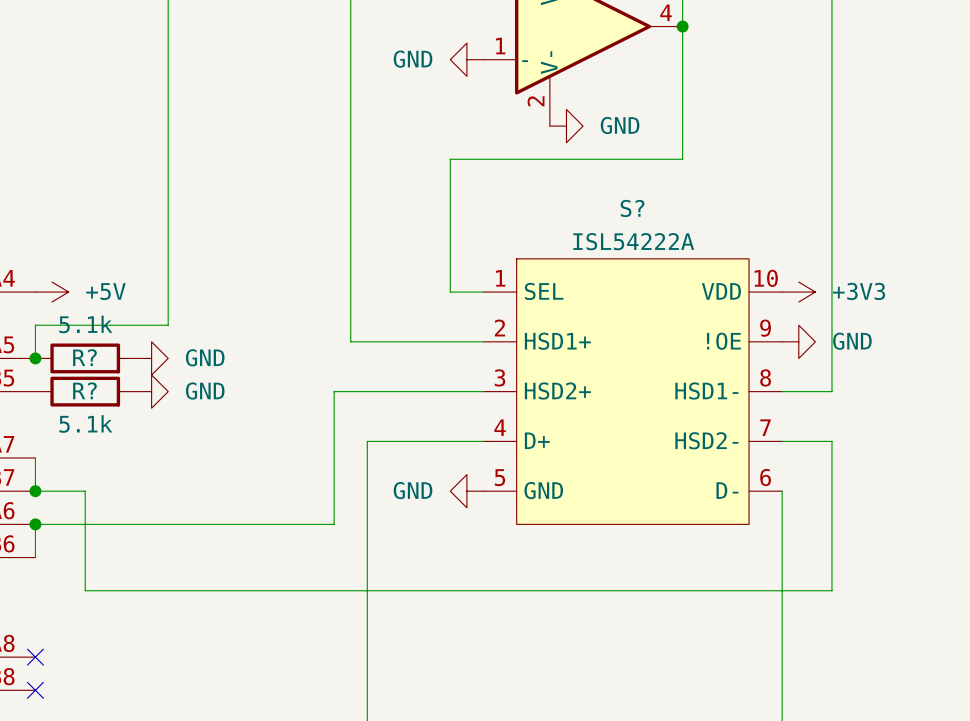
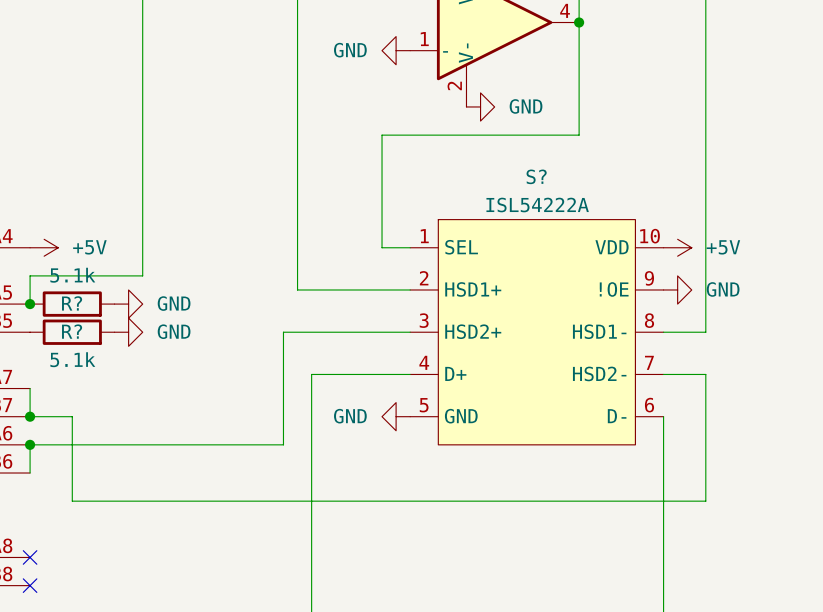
power symbol: +3V3 (798, 292) -> +5V (677, 247)

